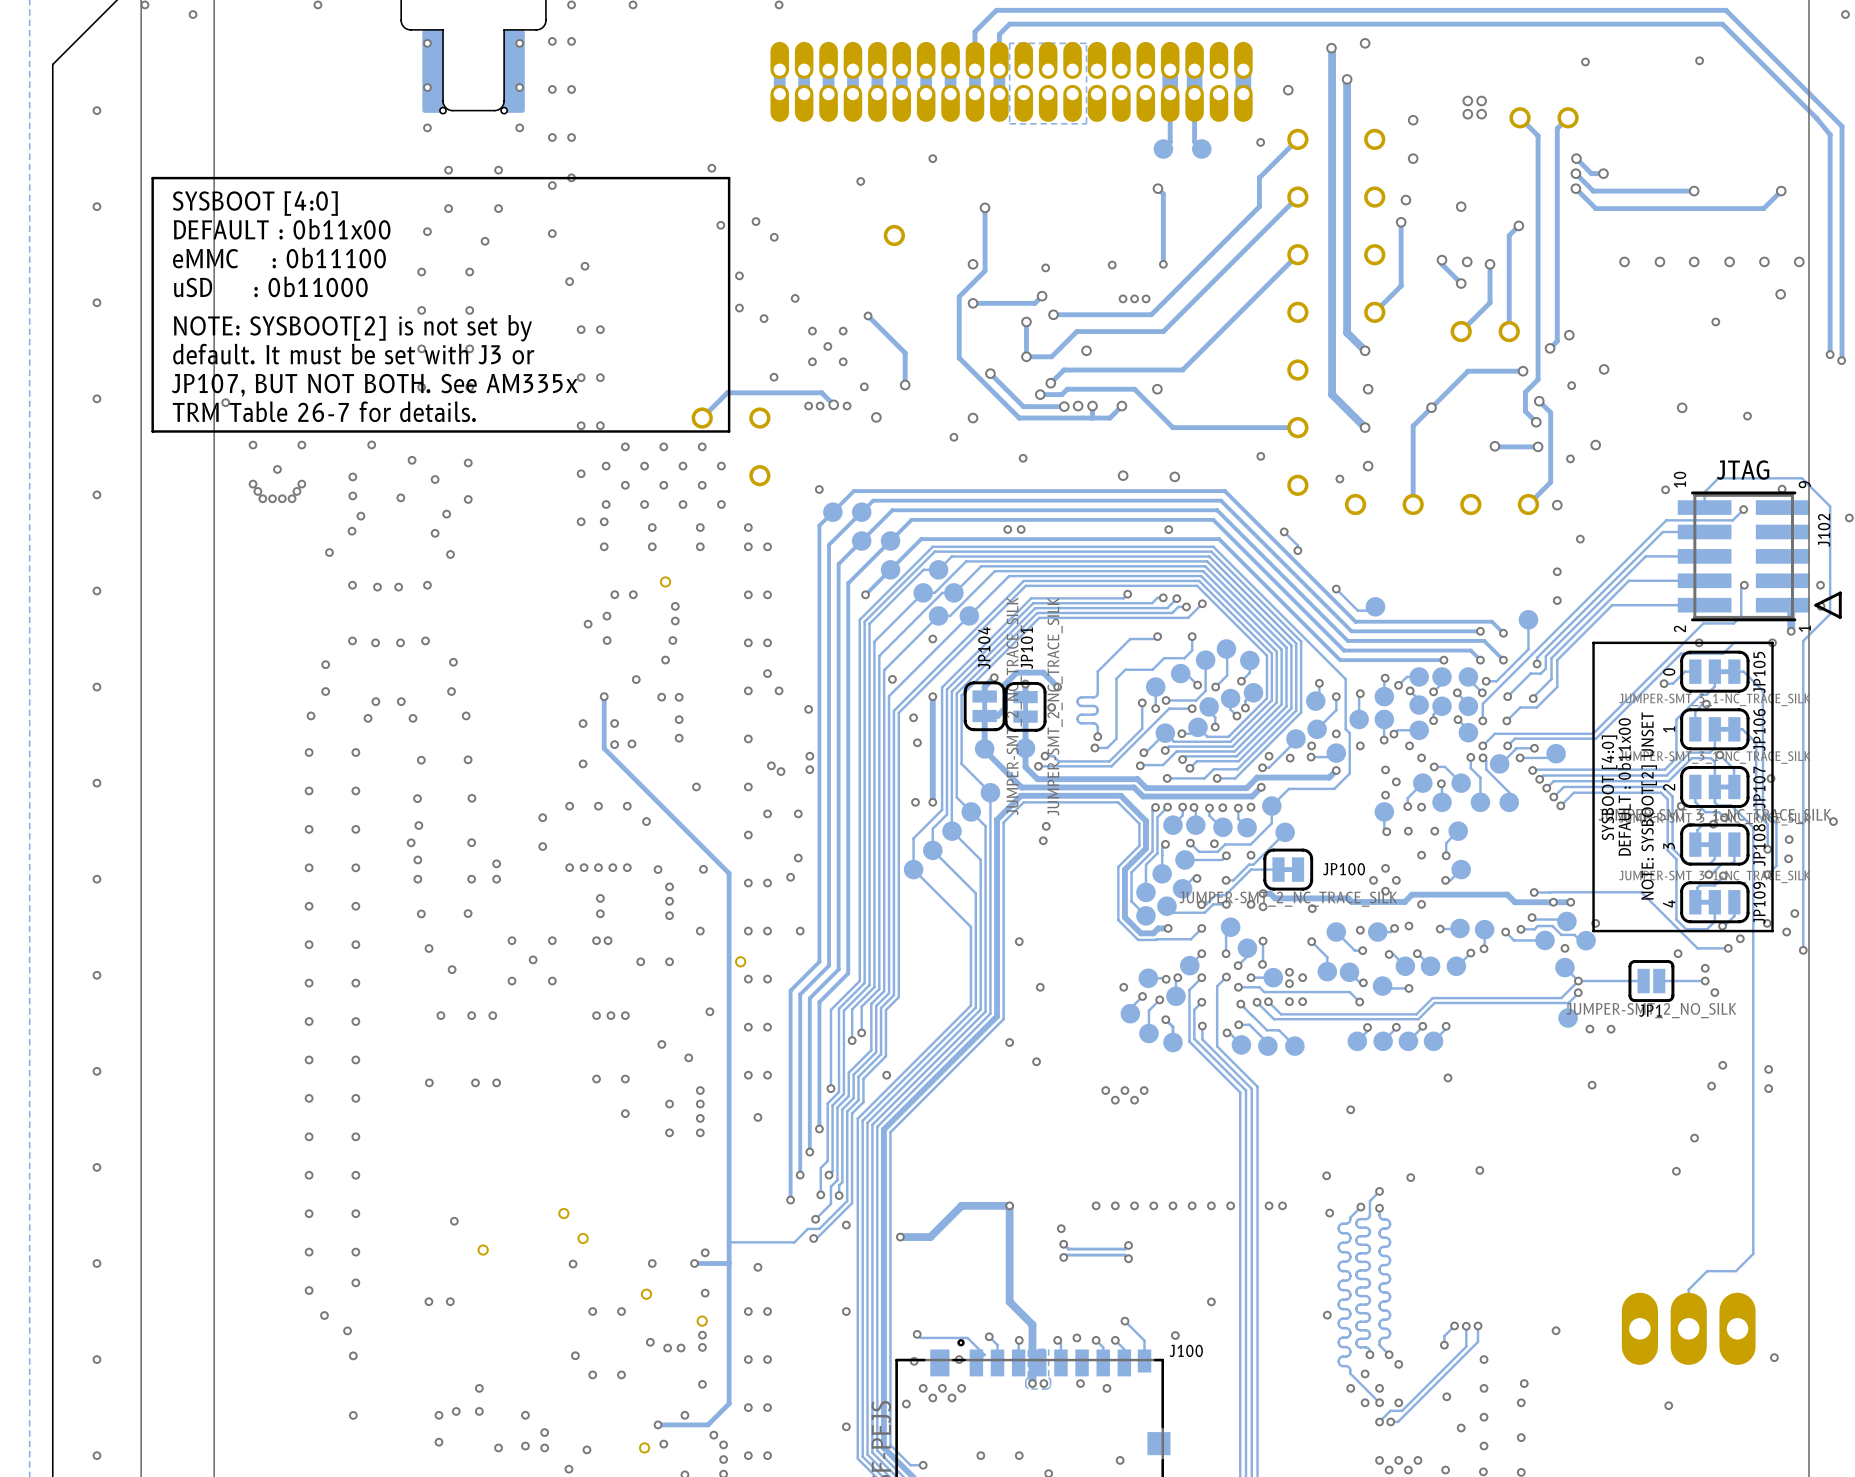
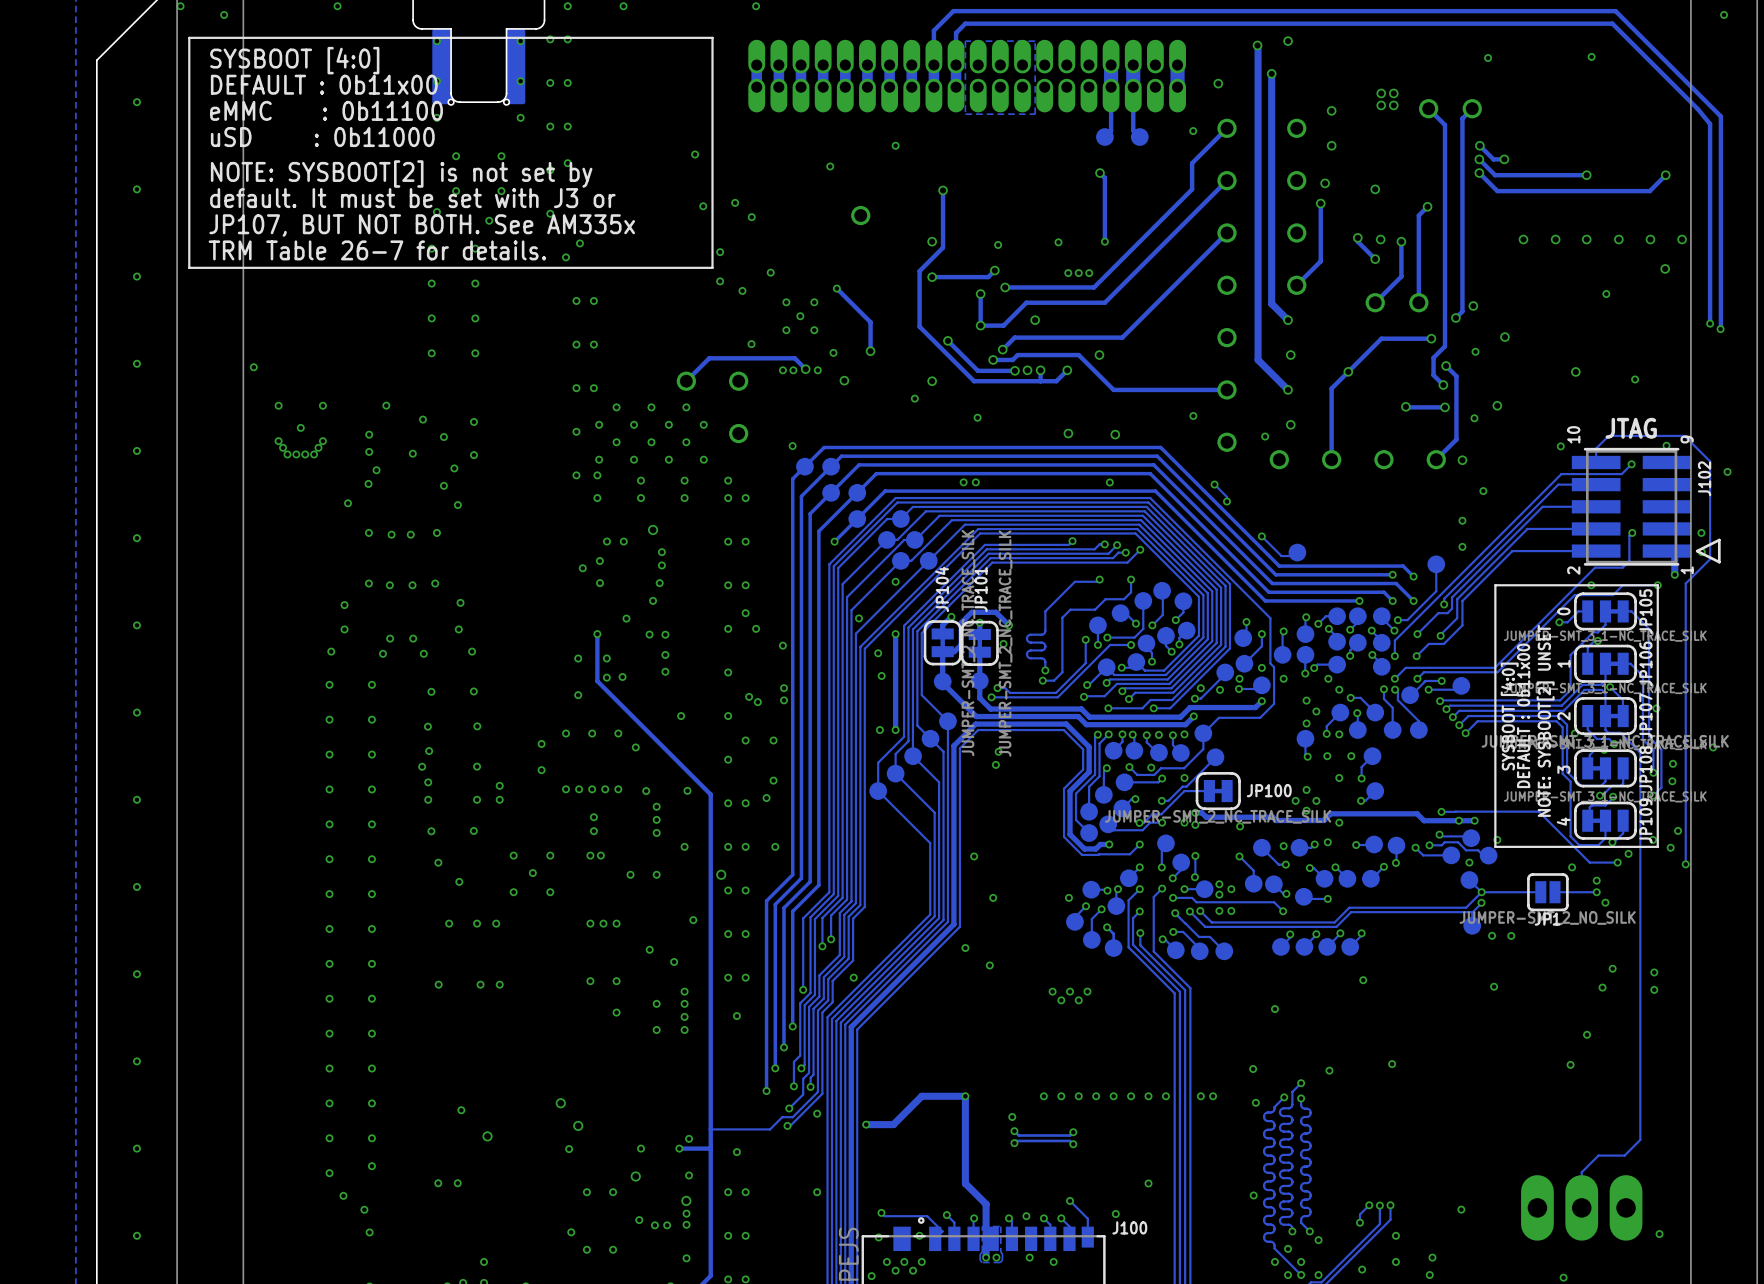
line: (729, 178) (729, 431) (152, 431) (152, 178) (729, 178) -> (712, 37) (712, 267) (189, 267) (189, 37) (712, 37)
text position: SYSBOOT [4:0] (255, 203) -> SYSBOOT [4:0] (294, 60)
text position: DEFAULT : 0b11x00 (282, 229) -> DEFAULT : 0b11x00 (324, 84)
text position: eMMC : 0b11100 (279, 258) -> eMMC : 0b11100 (326, 110)
text position: uSD : 0b11000 (270, 286) -> uSD : 0b11000 (322, 137)
text position: NOTE: SYSBOOT[2] is not set by (352, 328) -> NOTE: SYSBOOT[2] is not set by (401, 174)
text position: default. It must be set with J3 or (353, 354) -> default. It must be set with J3 or (412, 198)
text position: JP107, BUT NOT BOTH. See AM335x (374, 385) -> JP107, BUT NOT BOTH. See AM335x (422, 225)
text position: TRM Table 26-7 for details. (324, 411) -> TRM Table 26-7 for details. (377, 250)

